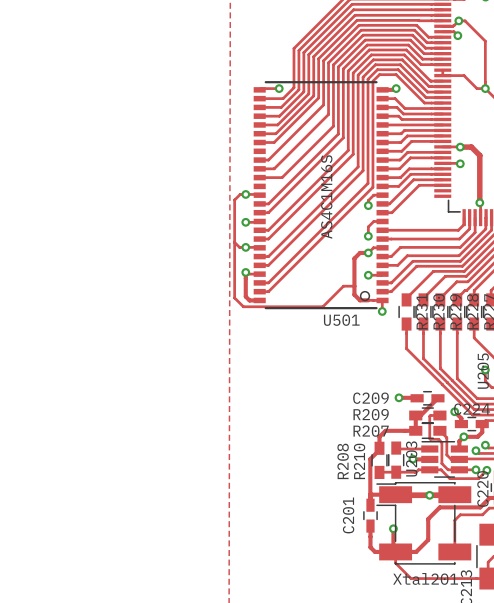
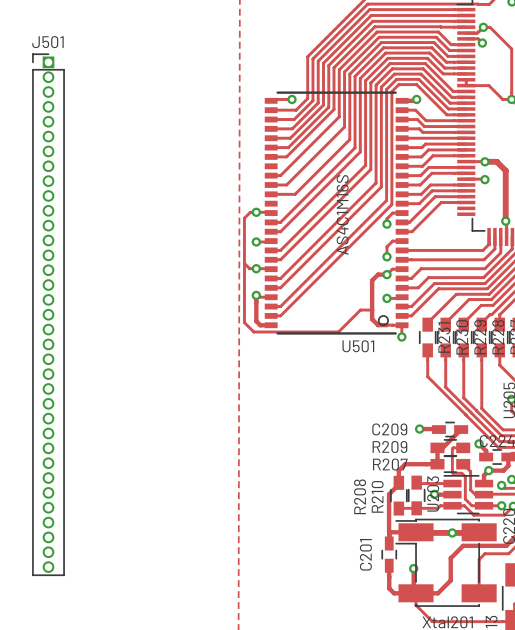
J501: none -> (48, 314)

